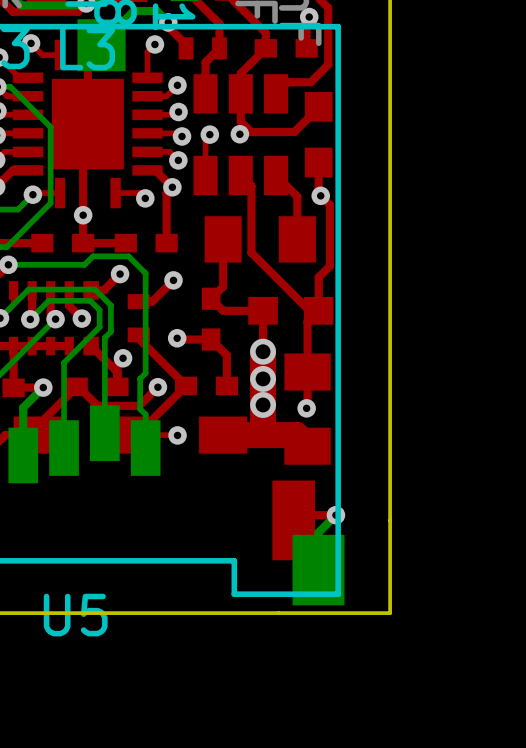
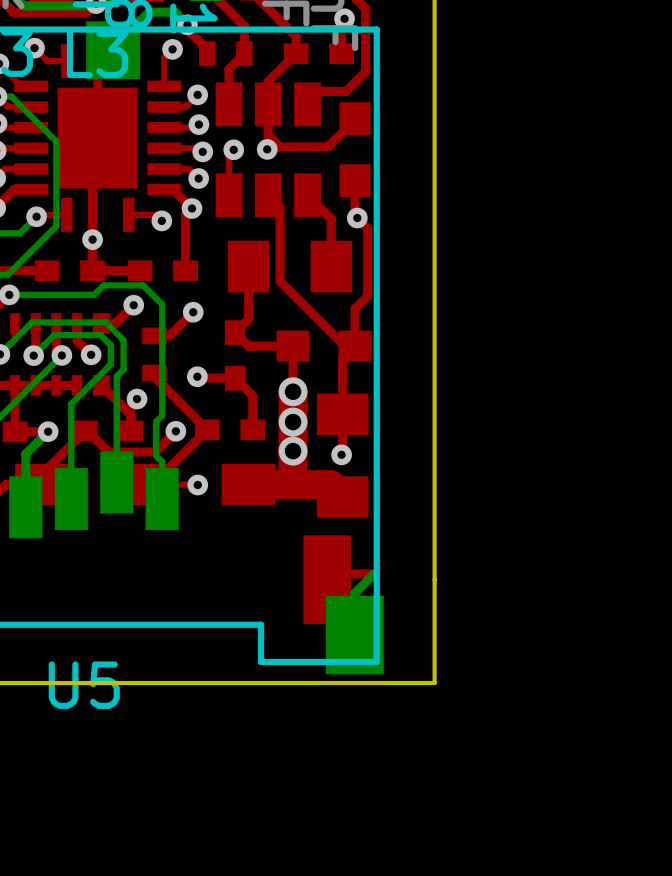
via: (335, 515) -> none

